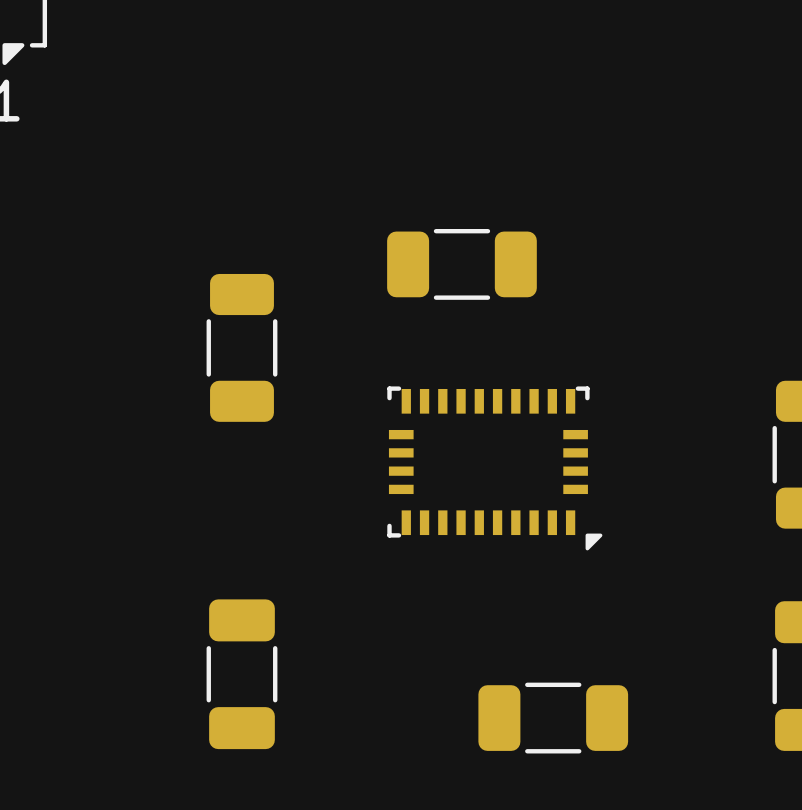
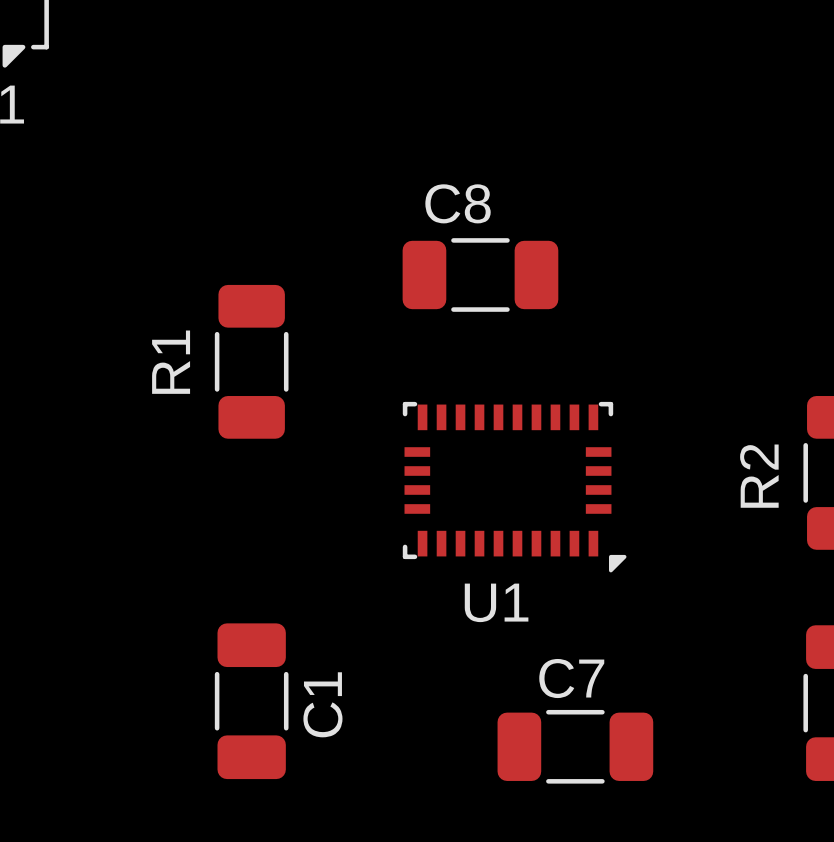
text: none -> C8 (458, 203)
text: none -> R1 (171, 362)
text: none -> R2 (759, 476)
text: none -> U1 (496, 602)
text: none -> C7 (571, 678)
text: none -> C1 (322, 704)

